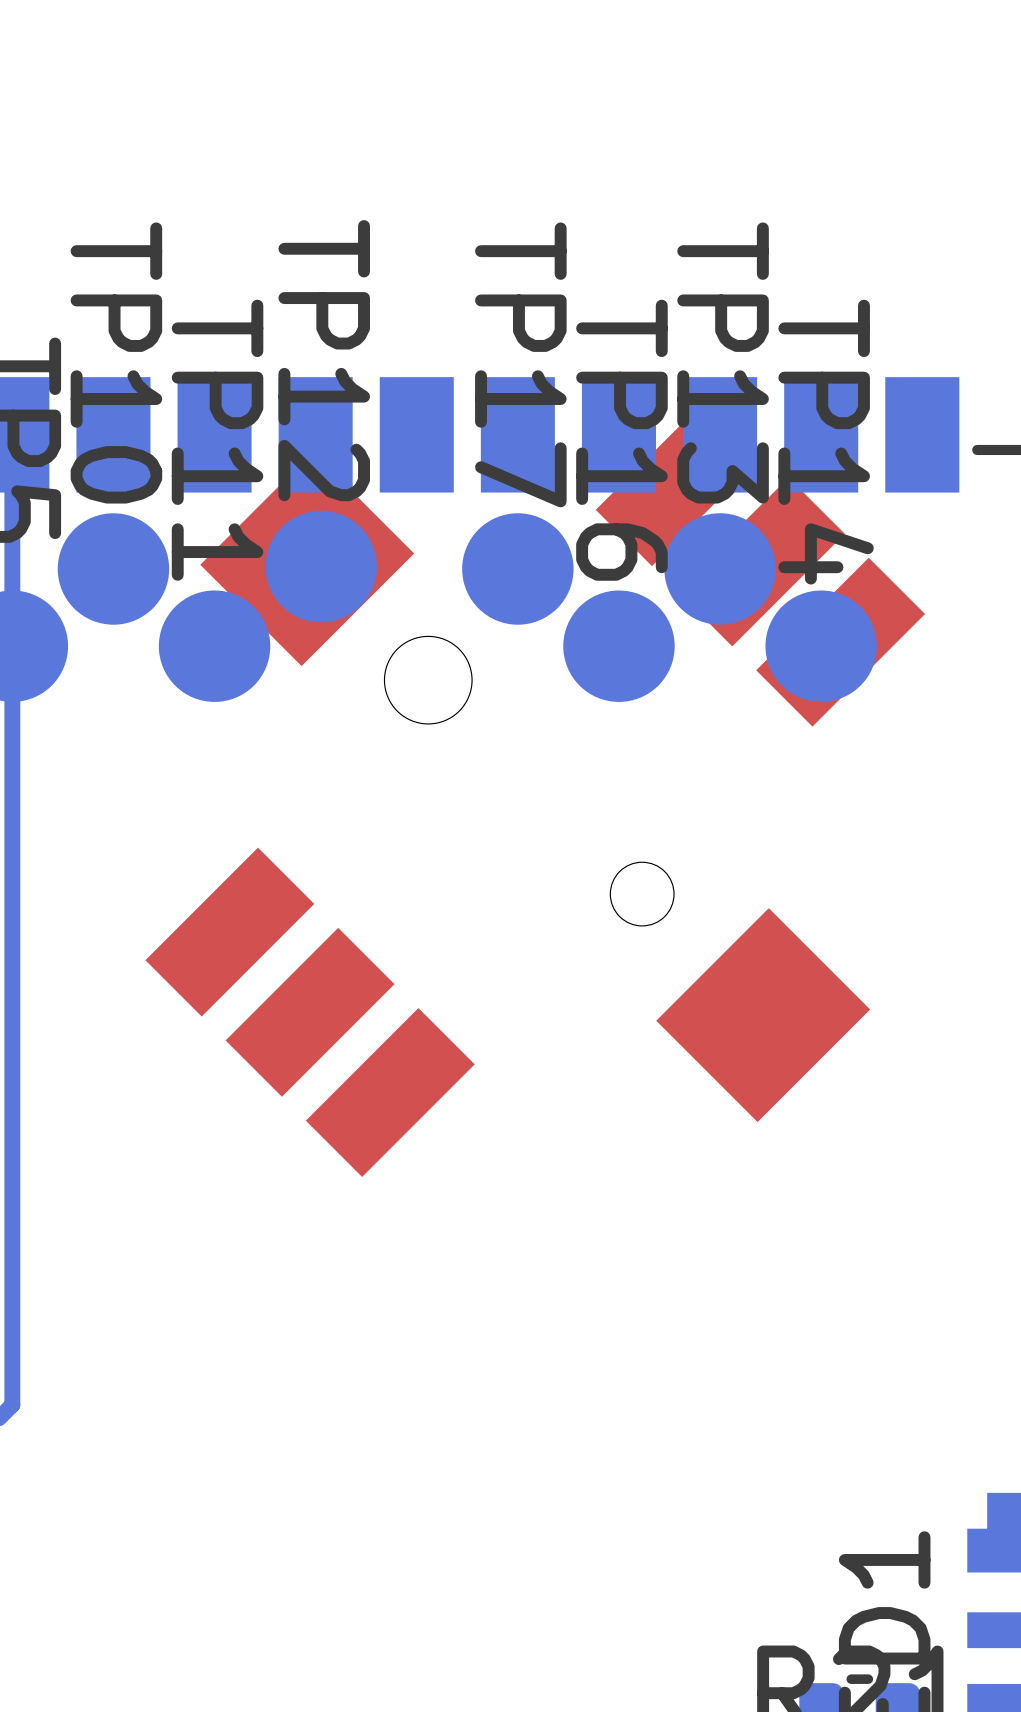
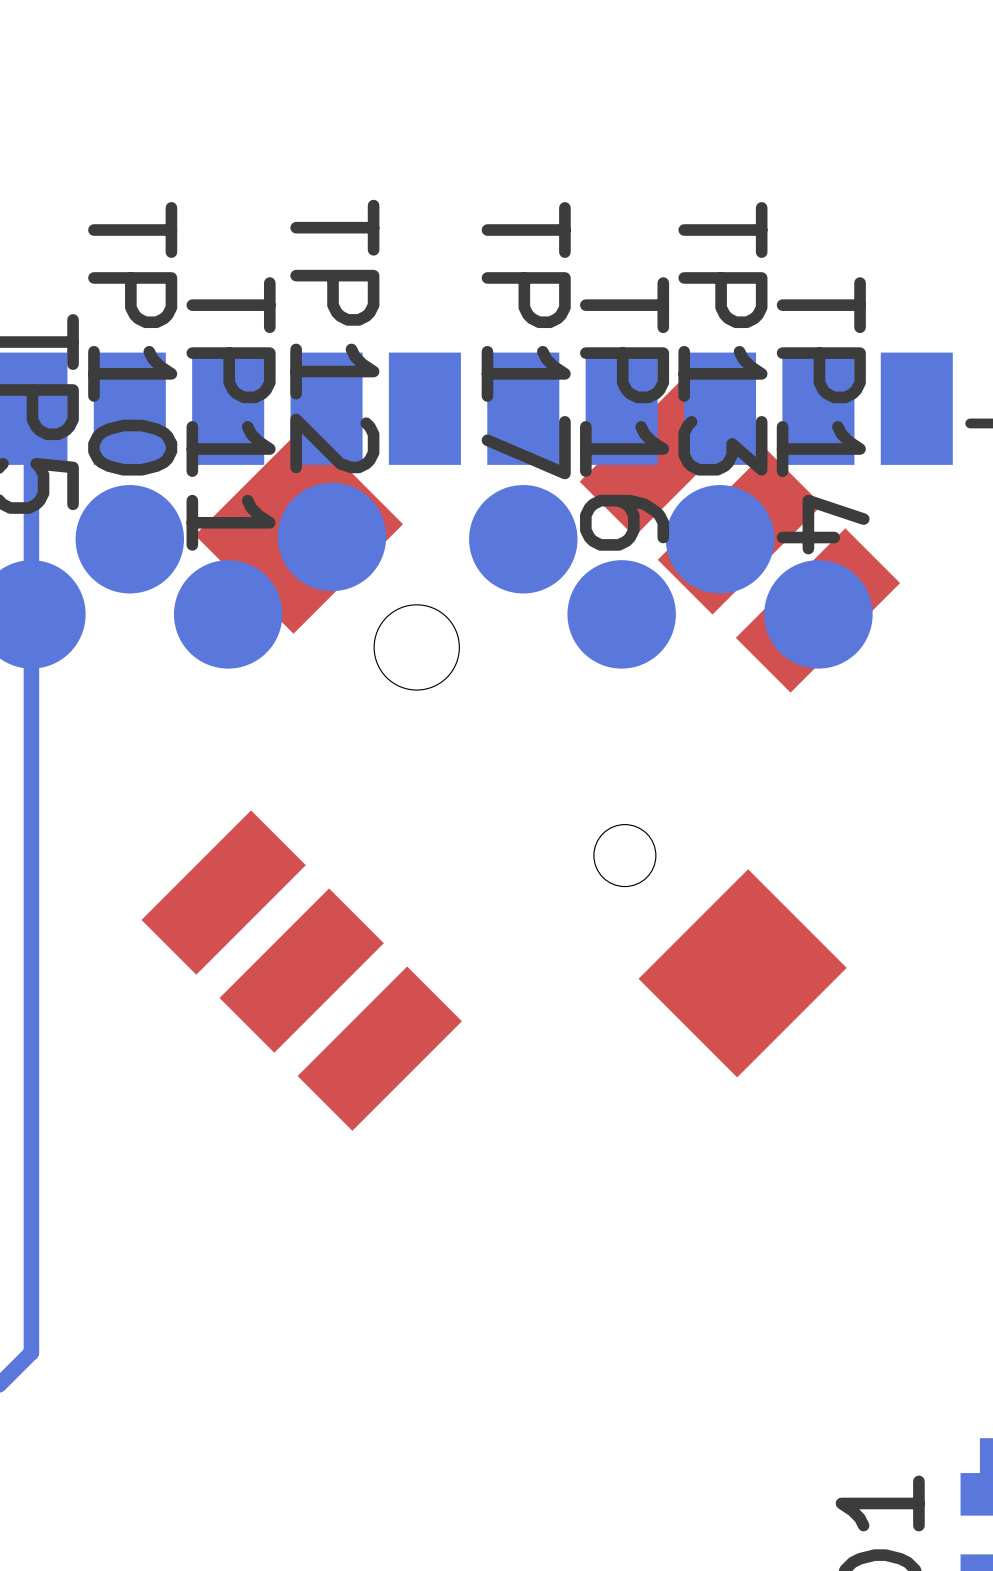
part position: (535, 787) -> (520, 751)

